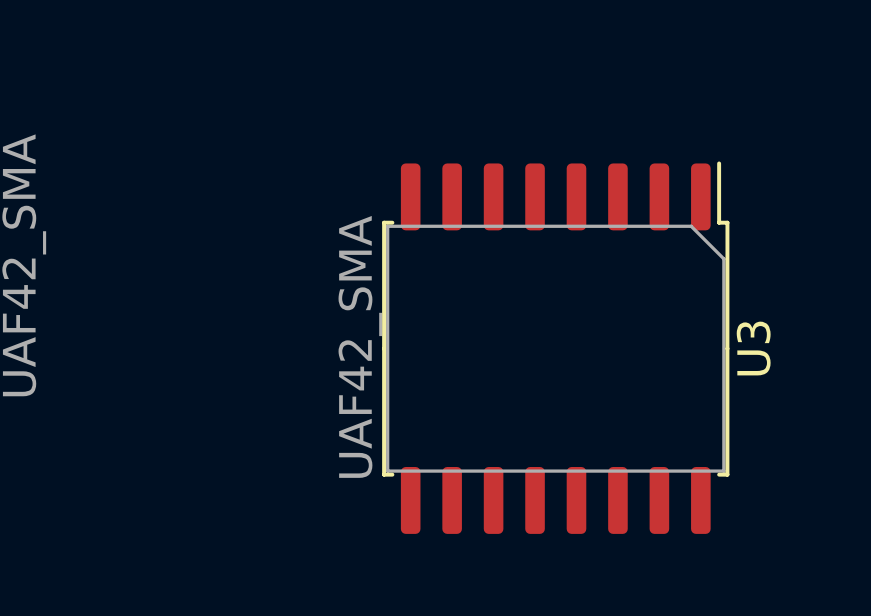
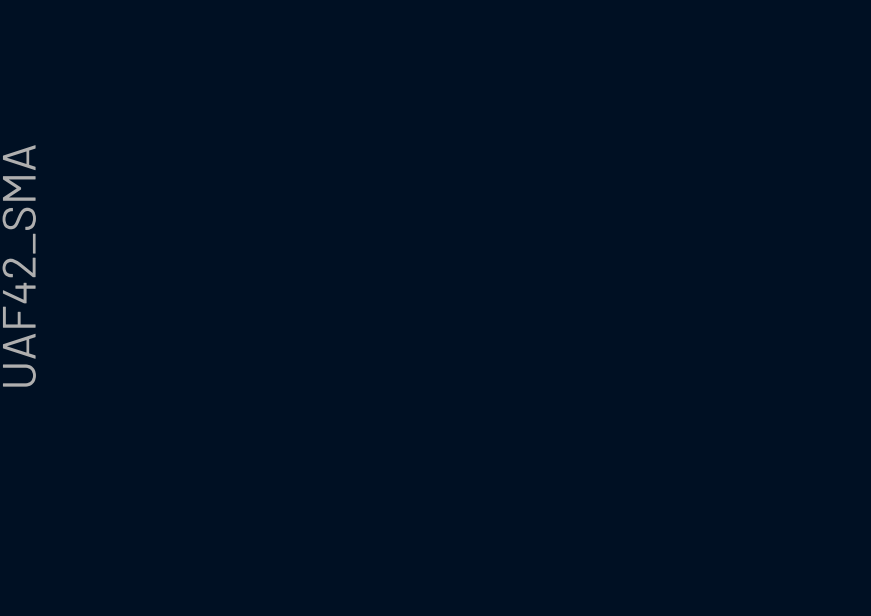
U3: UAF42_SMA (555, 347) -> none

